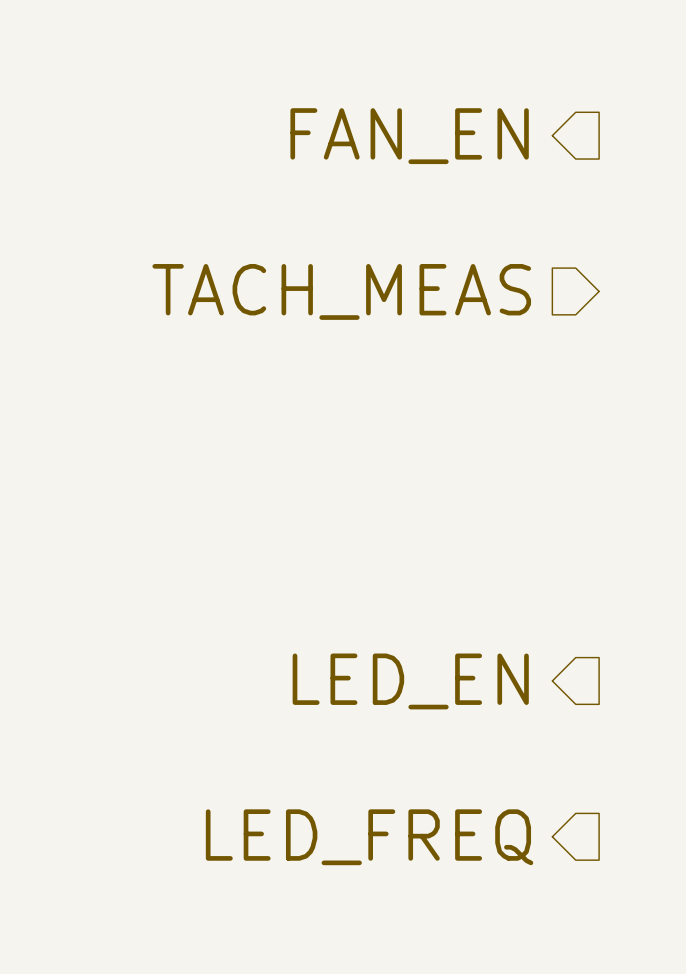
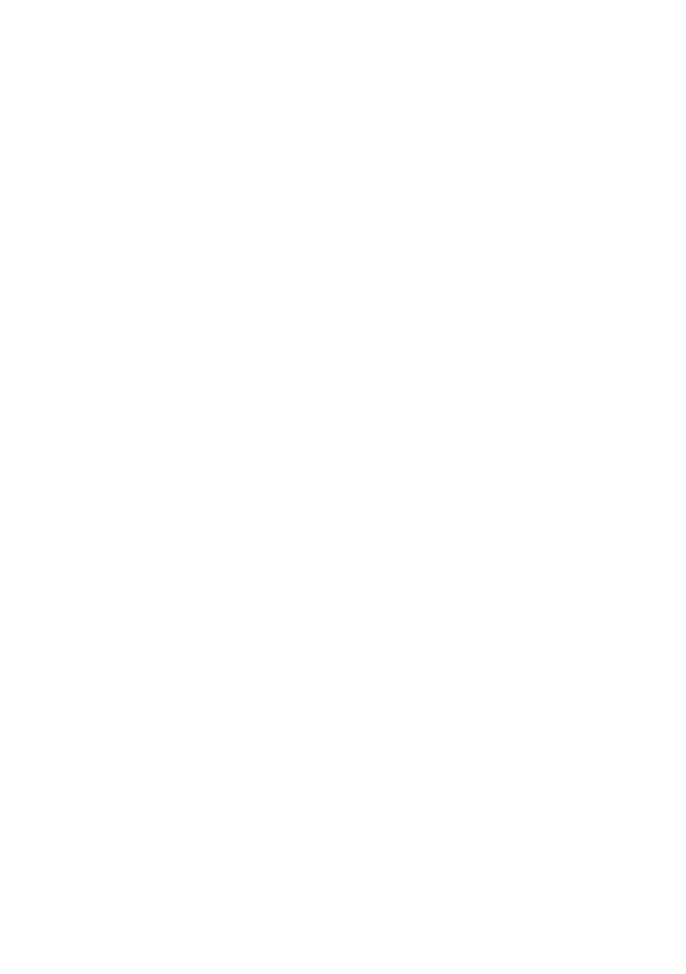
hierarchical label: FAN_EN (409, 136) -> none
hierarchical label: TACH_MEAS (341, 291) -> none
hierarchical label: LED_EN (410, 681) -> none
hierarchical label: LED_FREQ (369, 837) -> none

